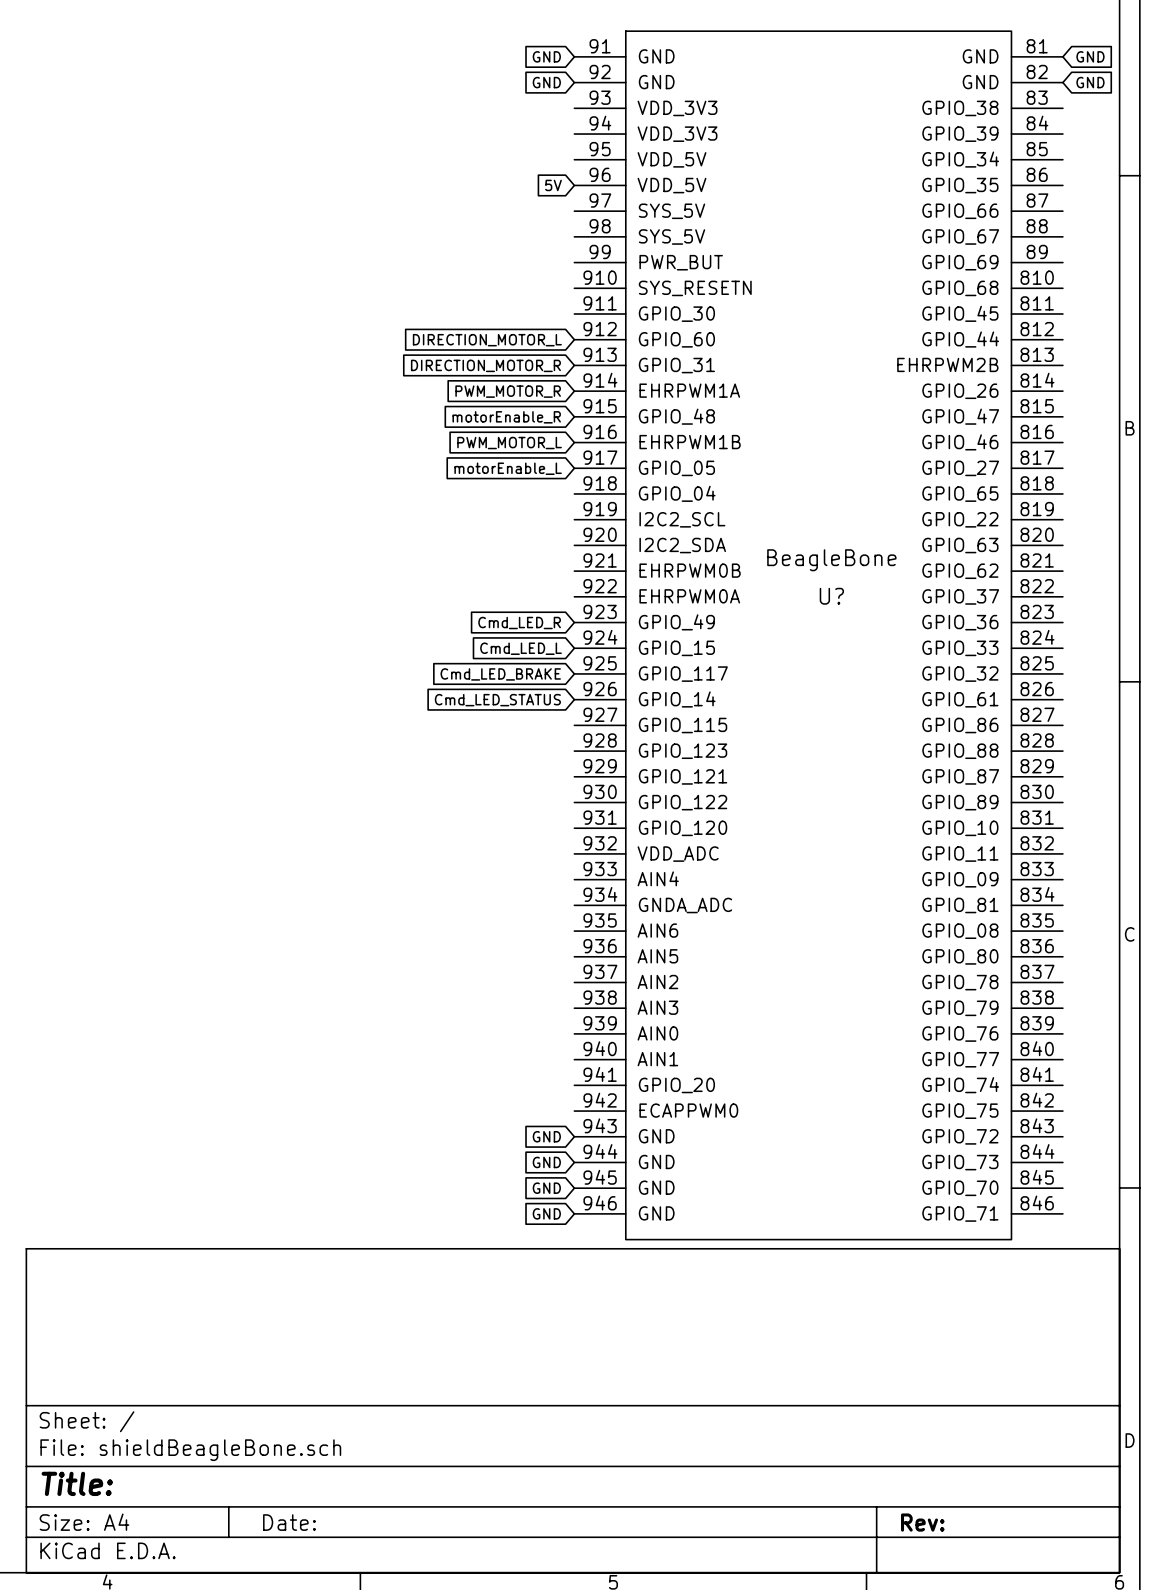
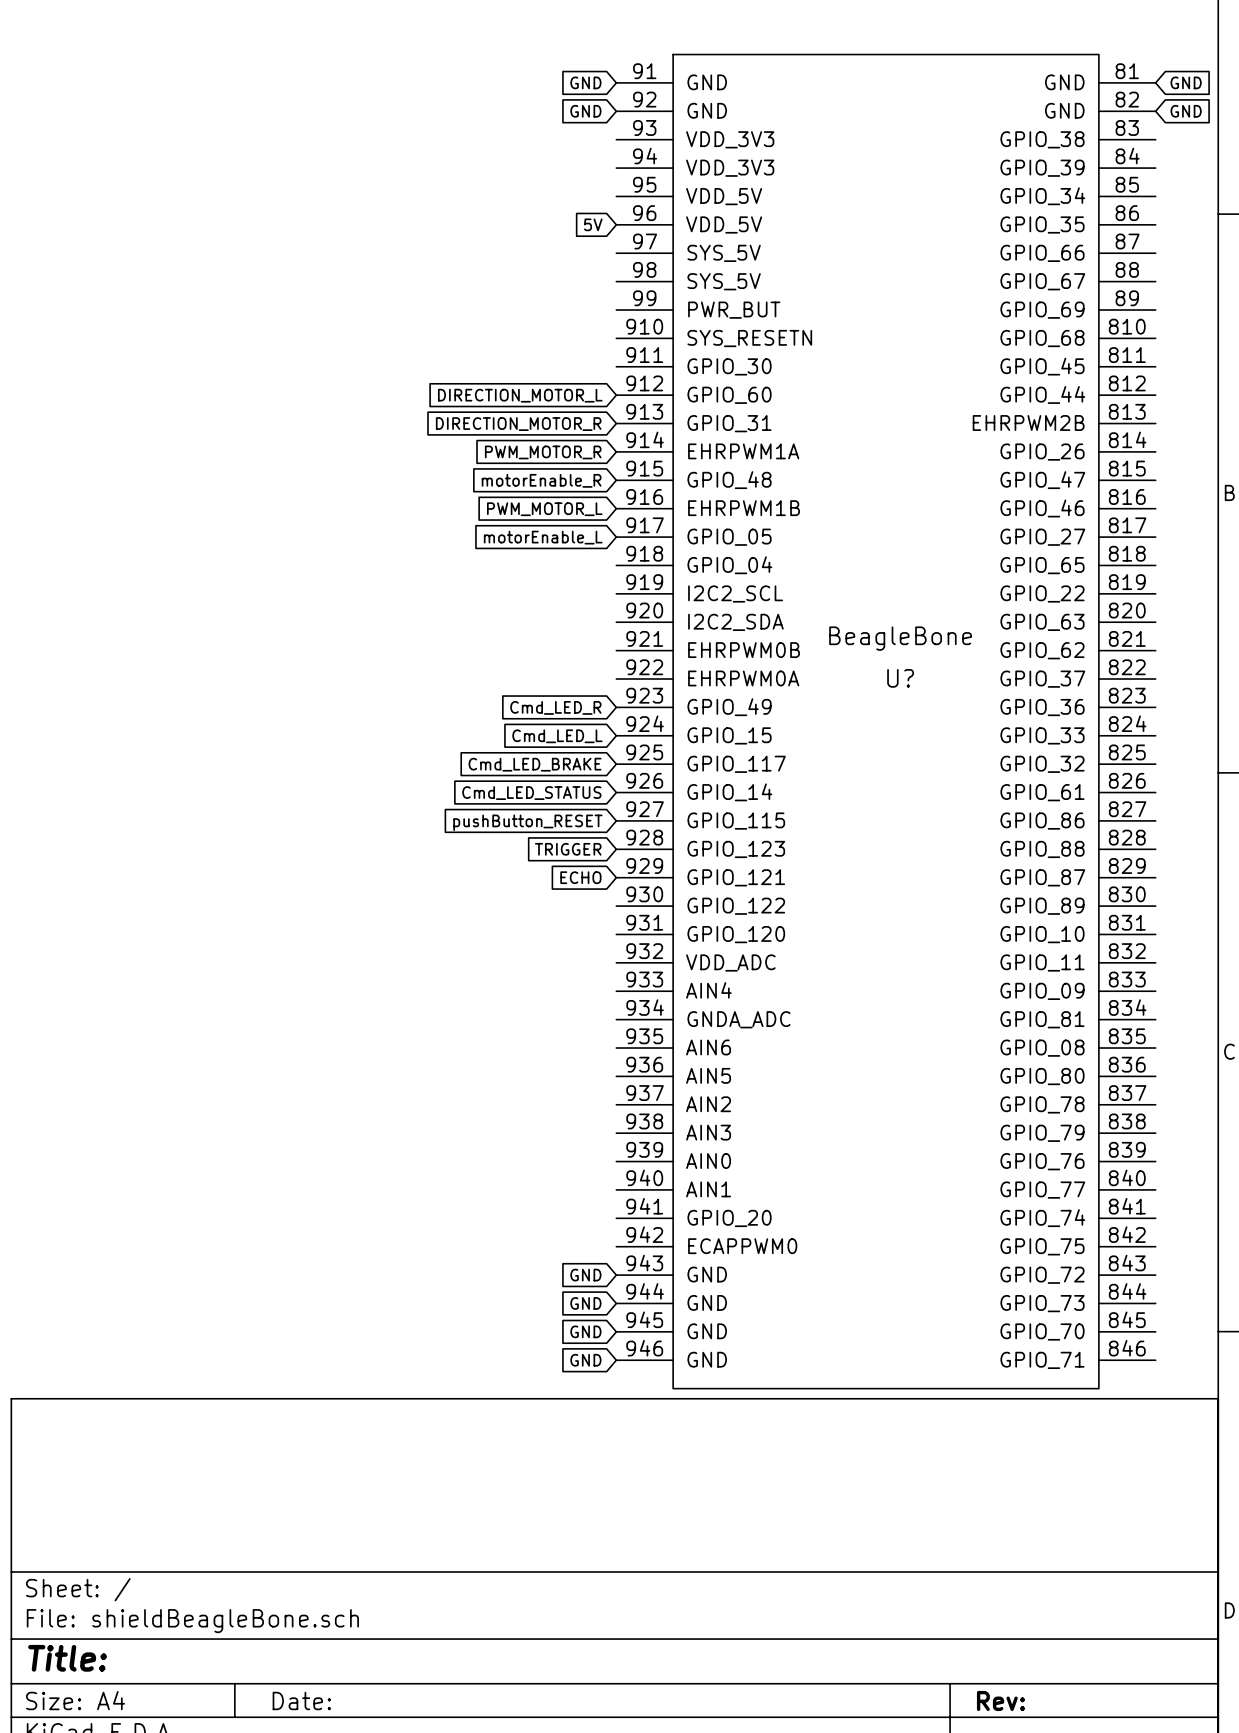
global label: none -> pushButton_RESET (527, 822)
global label: none -> TRIGGER (568, 849)
global label: none -> ECHO (580, 877)

